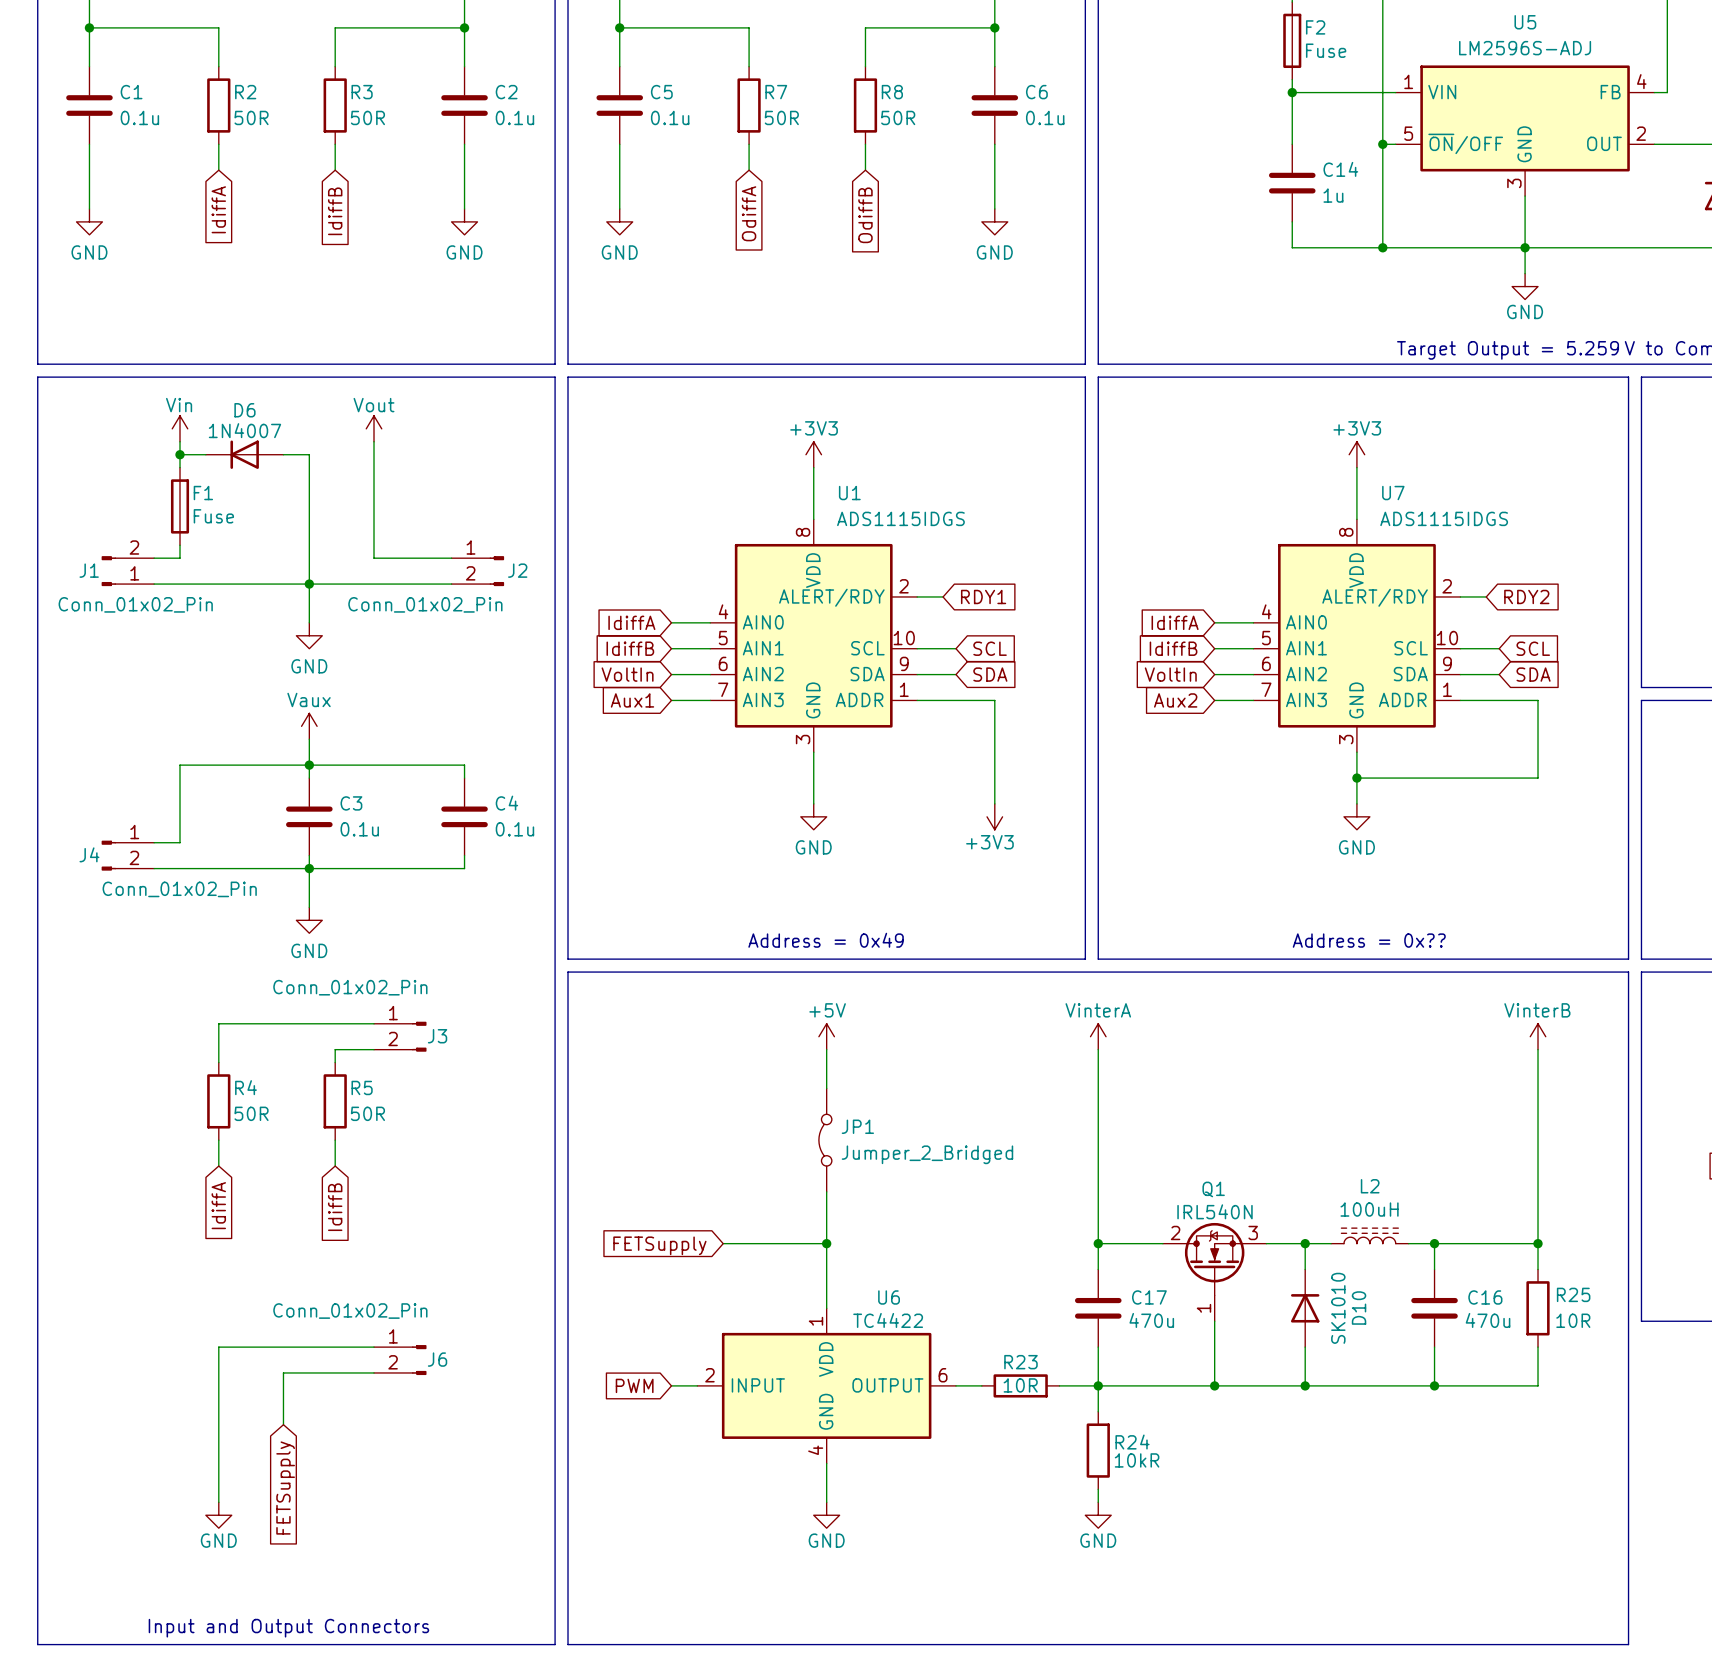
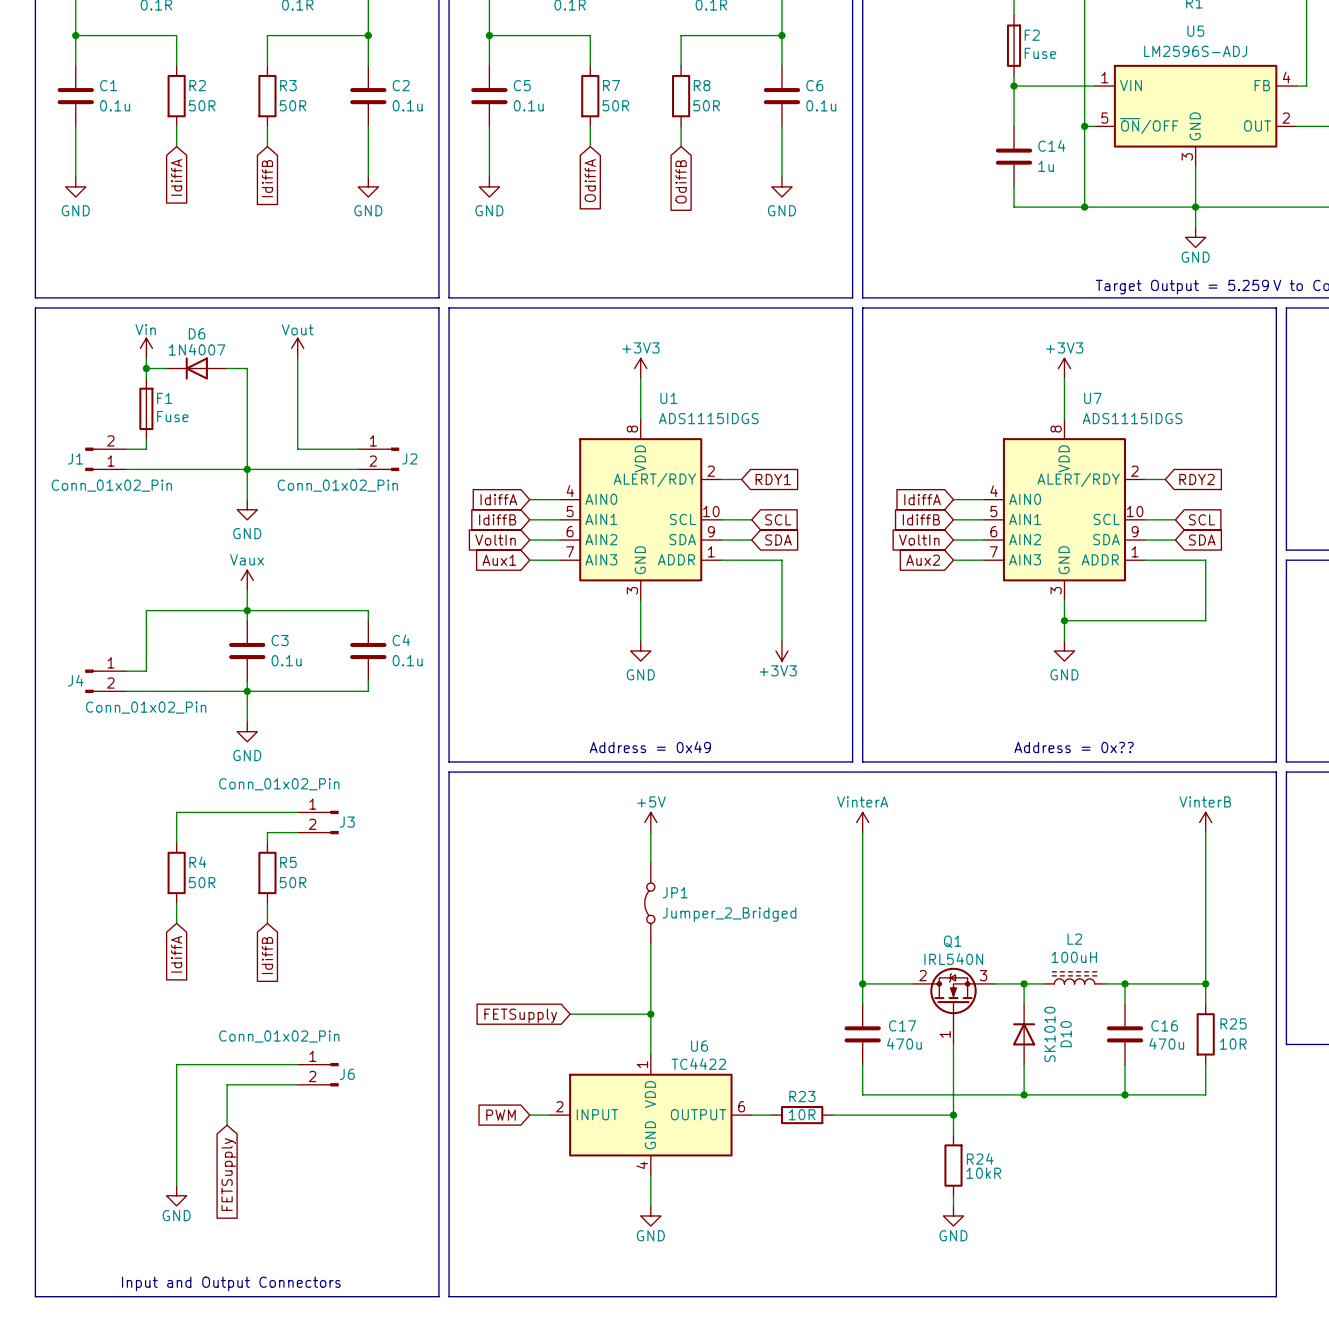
wire: (723, 1243) (826, 1243) -> (570, 1014) (650, 1014)
junction position: (826, 1243) -> (650, 1014)
global label position: FETSupply (659, 1245) -> FETSupply (520, 1015)
global label position: PWM (634, 1385) -> PWM (501, 1115)
wire: (671, 1385) (697, 1385) -> (529, 1115) (549, 1115)
U6 position: (826, 1385) -> (650, 1115)
wire: (956, 1385) (981, 1385) -> (751, 1115) (771, 1115)
R23 position: (1020, 1385) -> (802, 1115)
wire: (1059, 1385) (1098, 1385) (1098, 1411) -> none
junction: (1098, 1385) -> none
wire: none -> (953, 1094) (953, 1135)
junction position: (1214, 1385) -> (953, 1115)
wire: none -> (832, 1115) (953, 1115)
R24 position: (1098, 1450) -> (953, 1165)
wire: (1098, 1489) (1098, 1502) -> (953, 1195) (953, 1205)
power symbol position: GND (826, 1515) -> GND (650, 1215)
power symbol position: GND (1098, 1515) -> GND (953, 1215)

